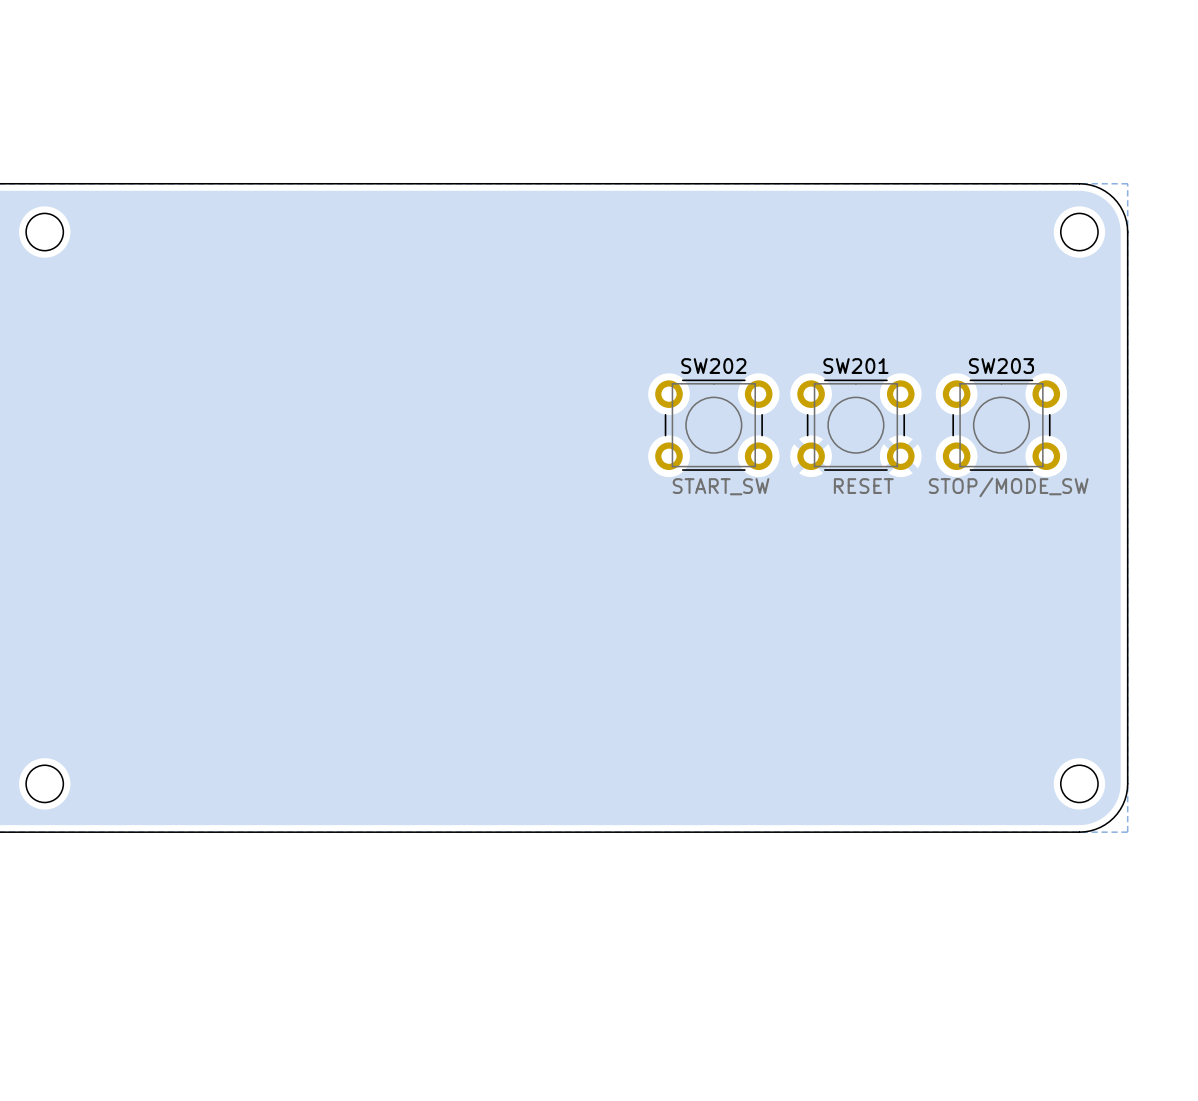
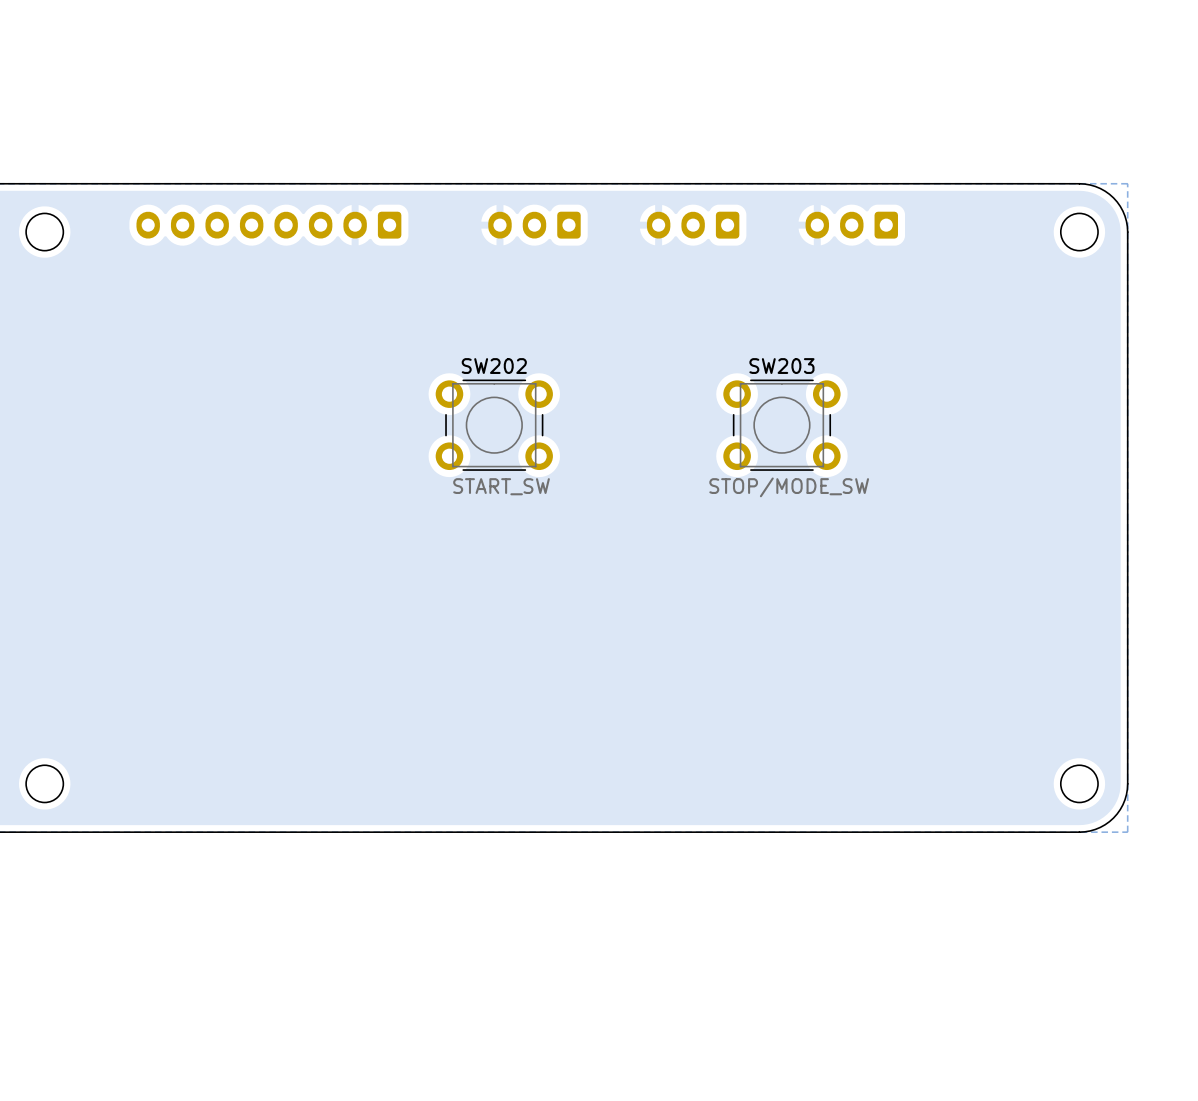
part: none -> (268, 225)
part: none -> (534, 225)
part: none -> (693, 225)
part: none -> (851, 225)
SW202 position: (713, 425) -> (494, 425)
SW201: RESET (855, 425) -> none
SW203 position: (1001, 425) -> (781, 425)

